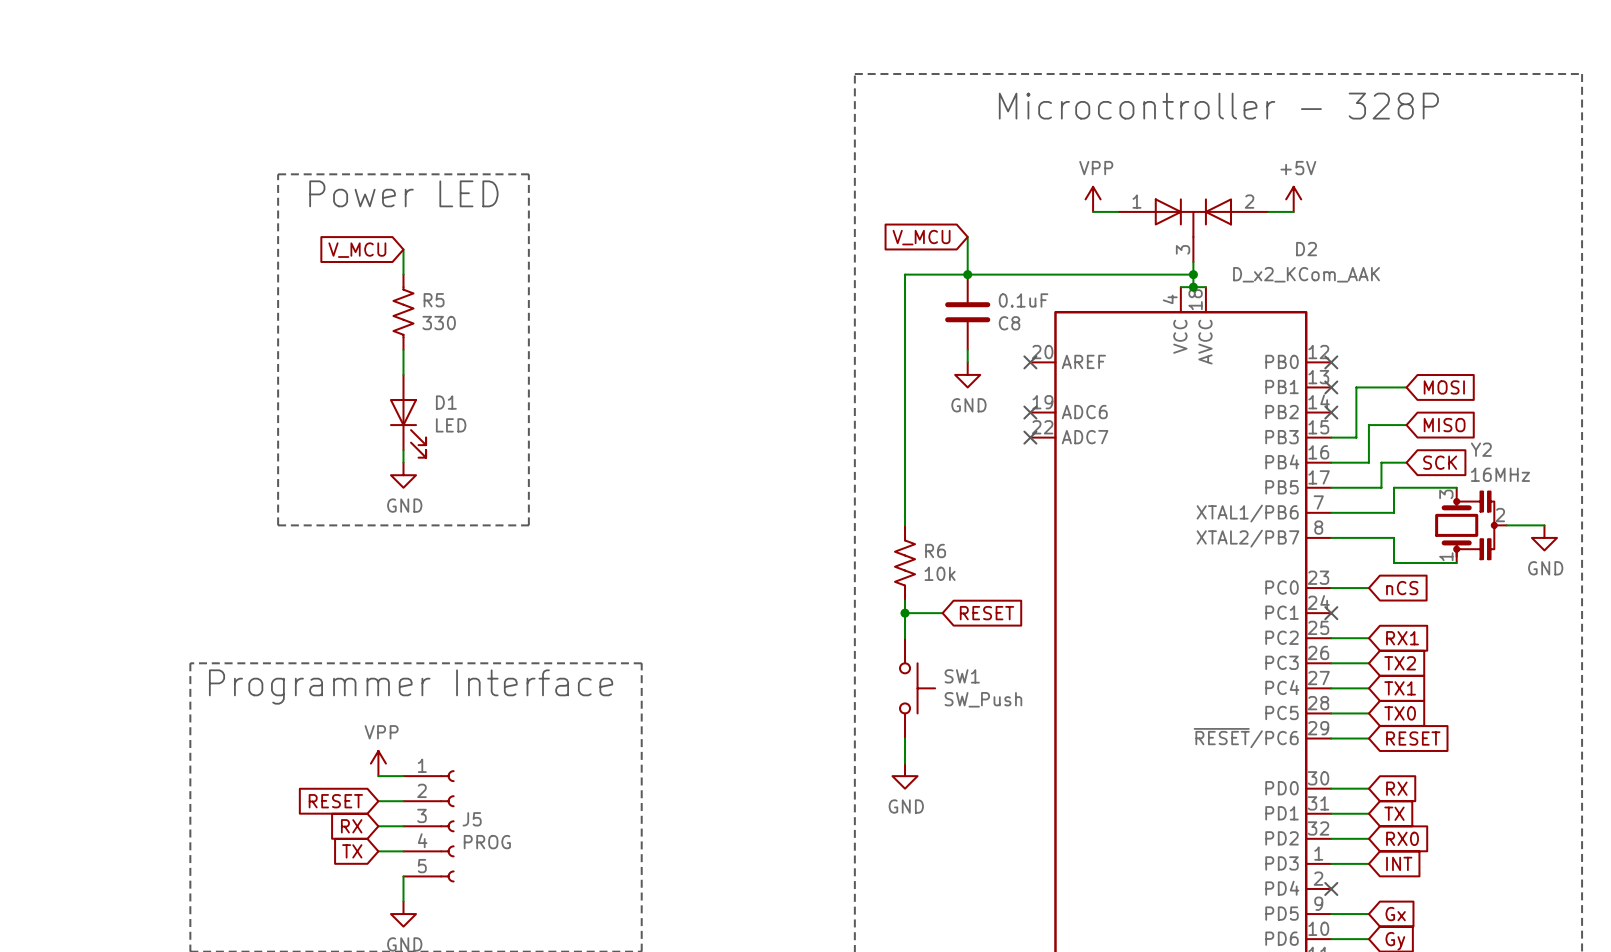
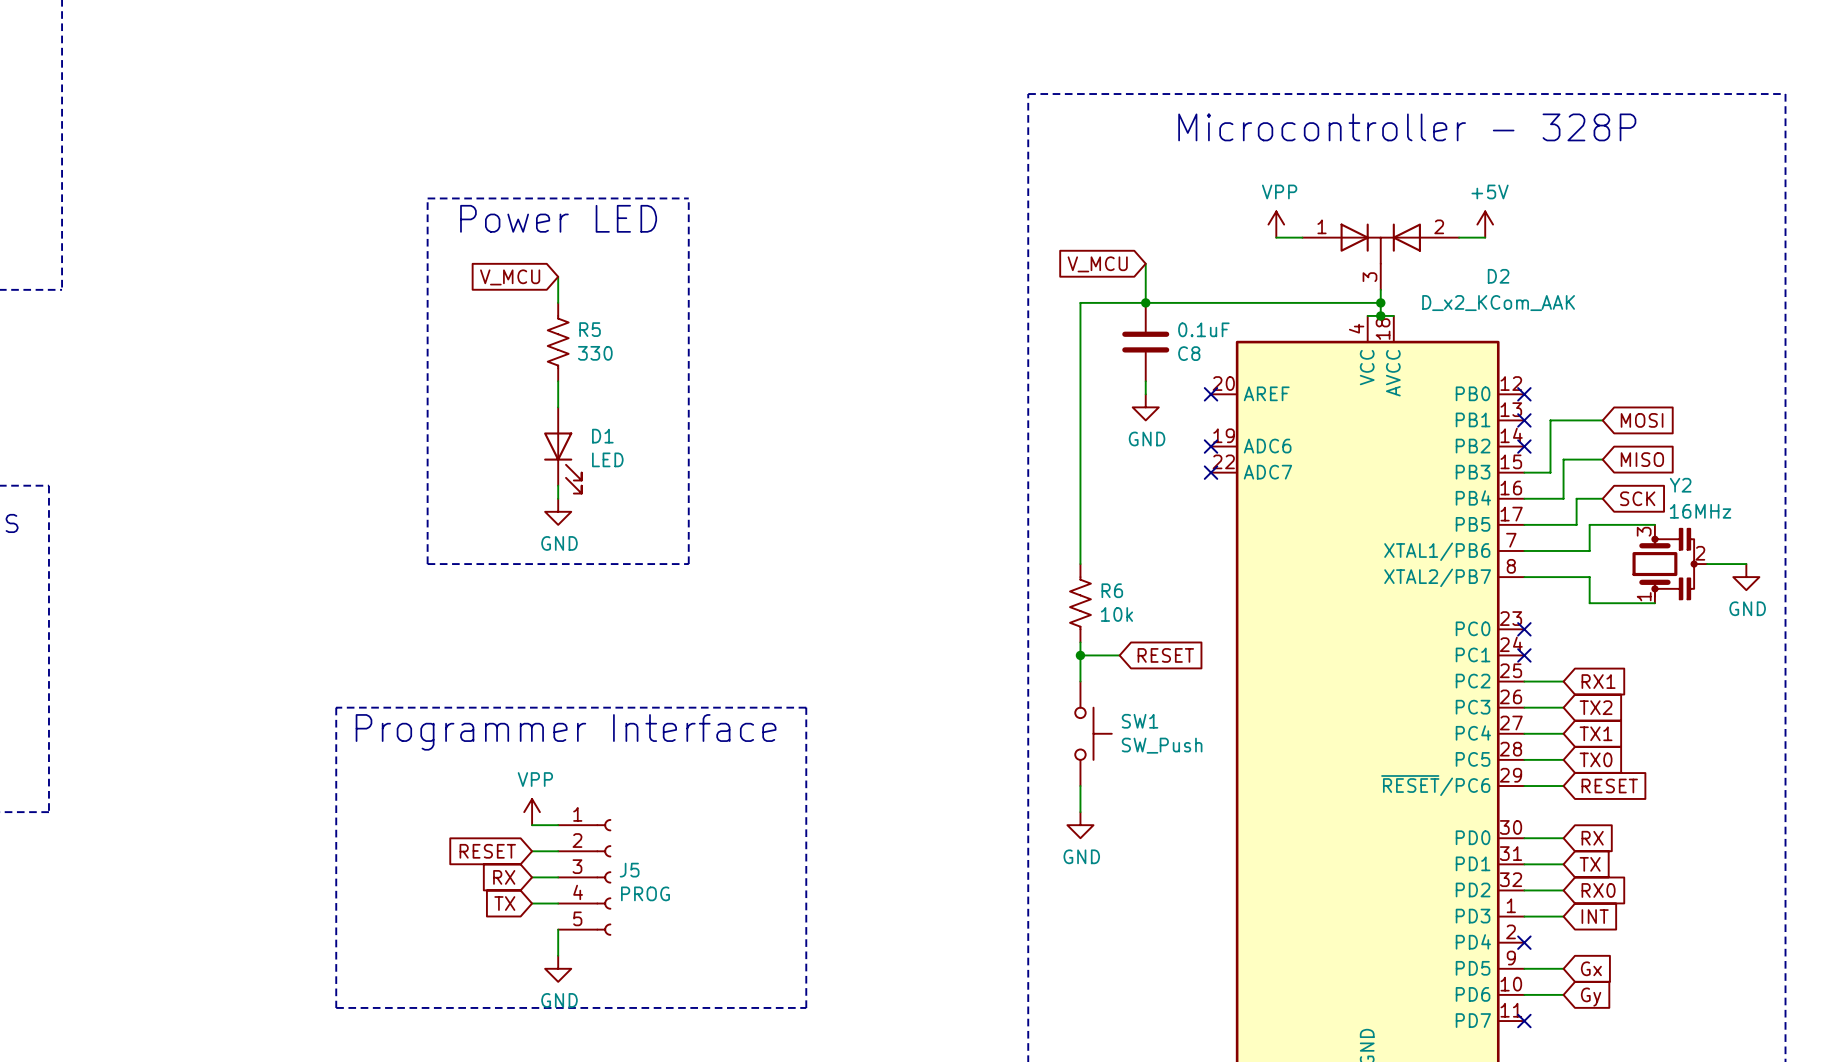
wire: (1331, 588) (1368, 588) -> none
no-connect mark: none -> (1524, 629)
global label: nCS (1402, 588) -> none

